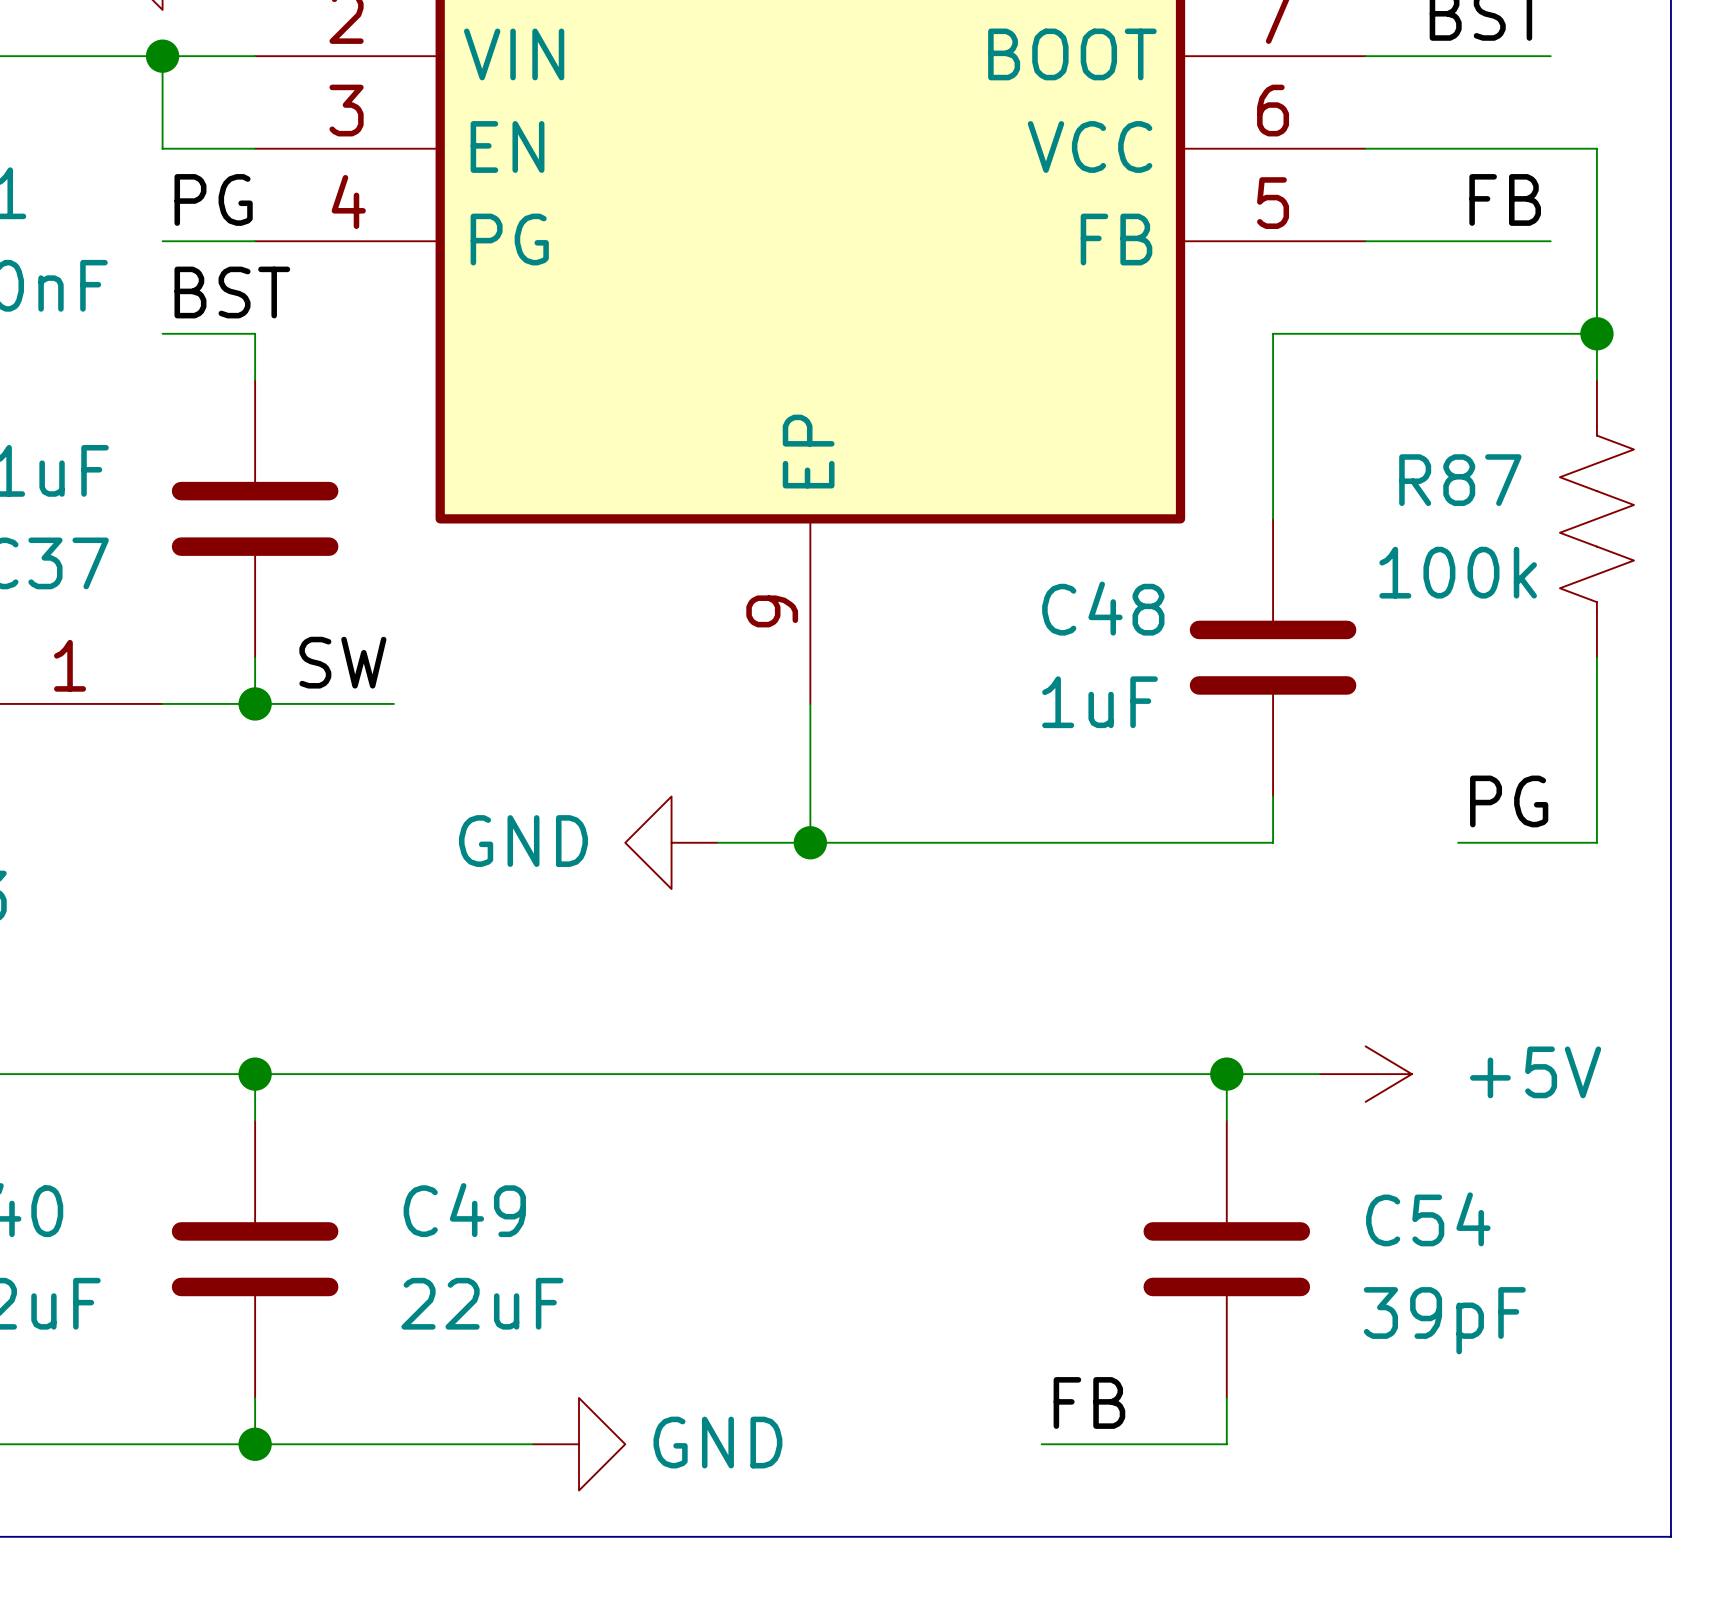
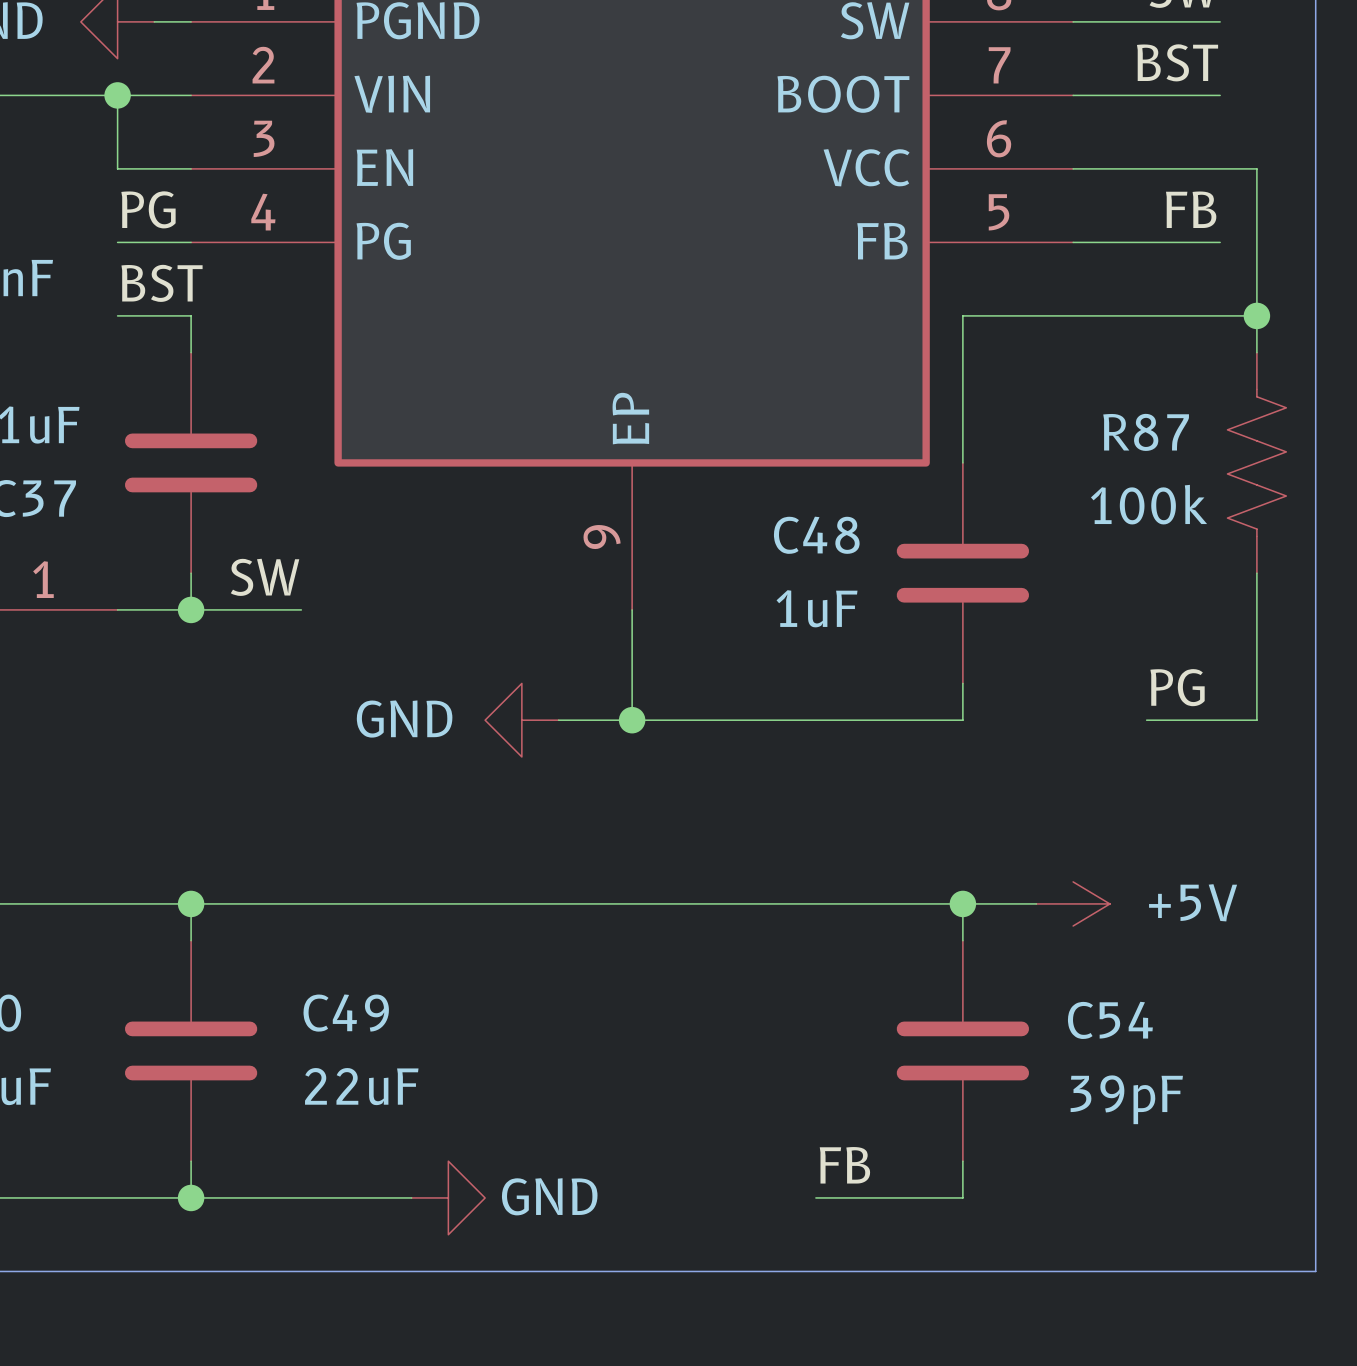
wire: (1273, 333) (1273, 518) -> (999, 315) (962, 315) (962, 462)
C48 position: (1273, 657) -> (962, 573)
wire: (1273, 796) (1273, 842) (1226, 842) -> (962, 683) (962, 720)

